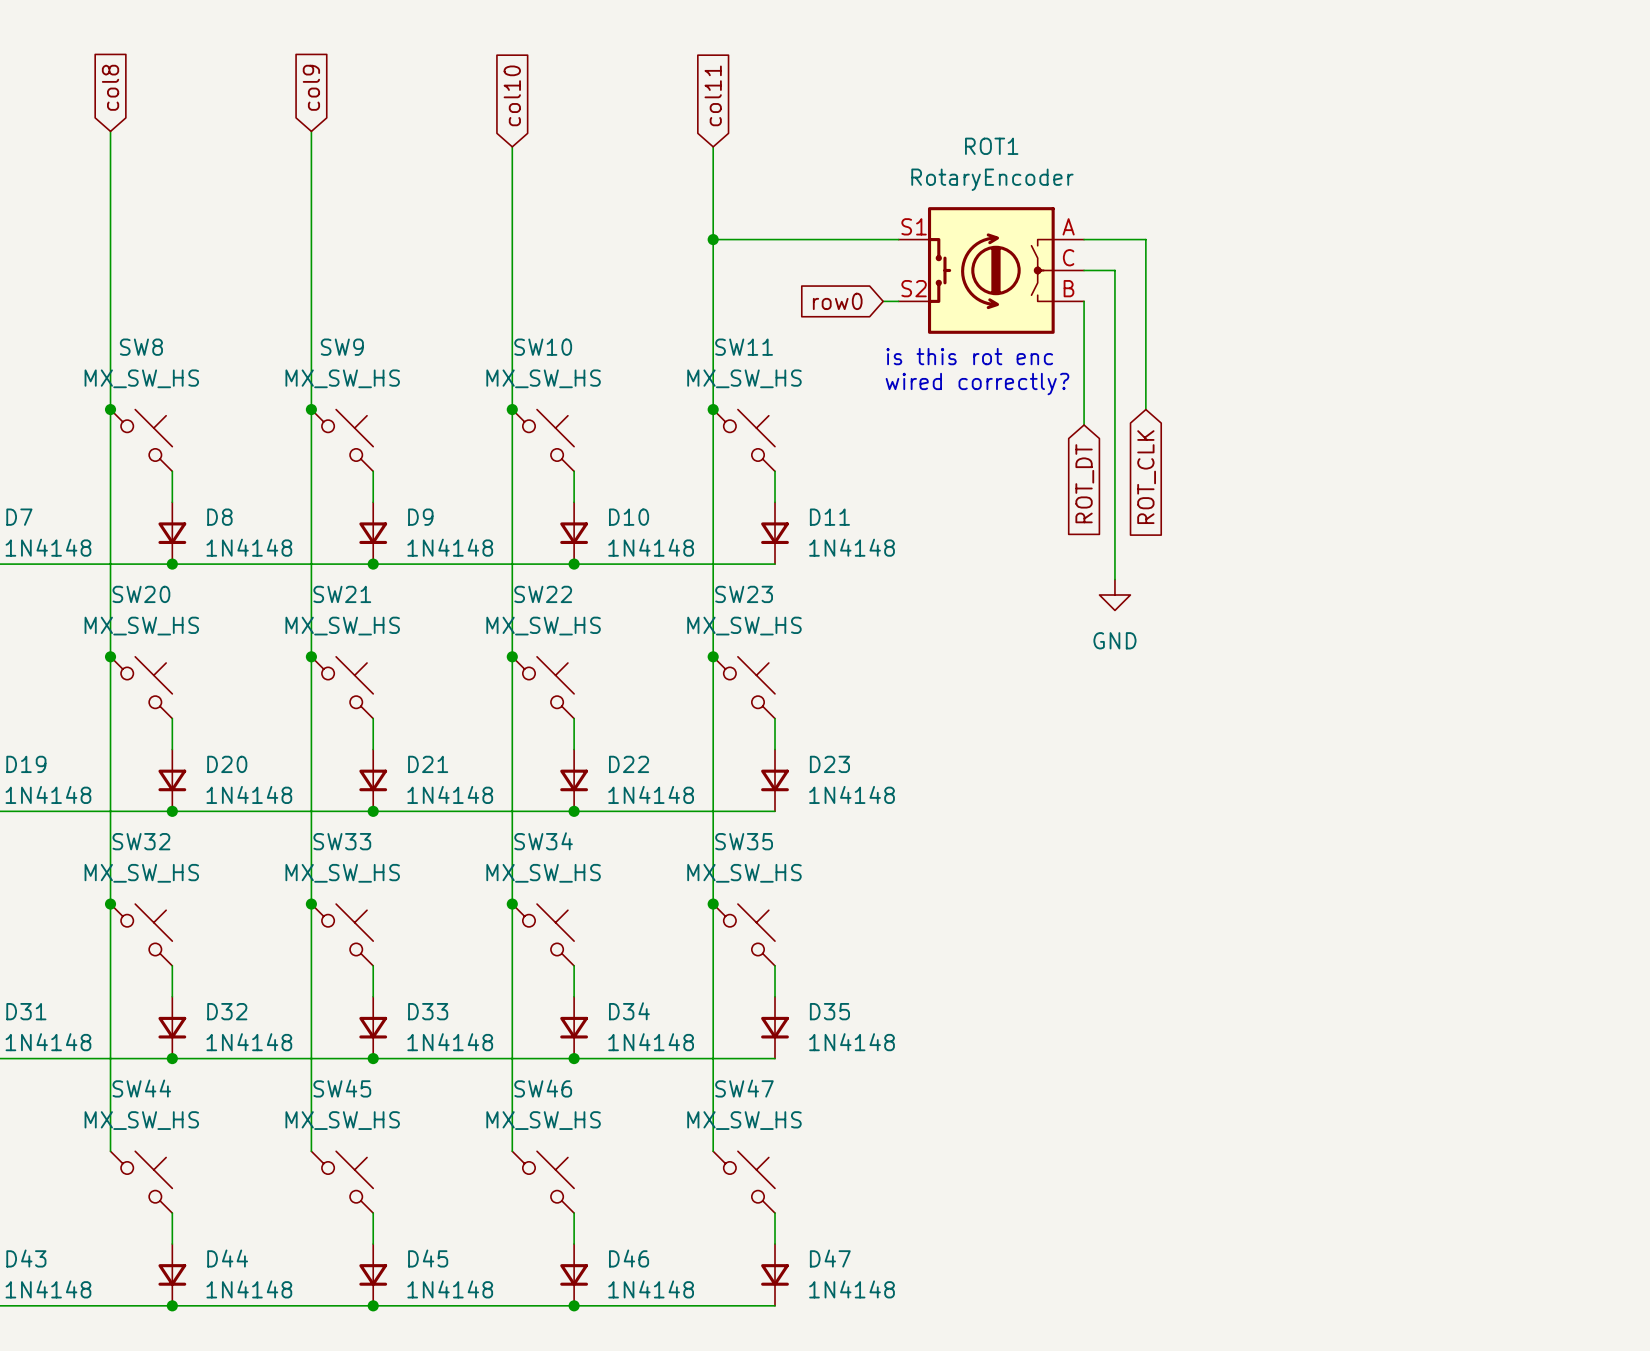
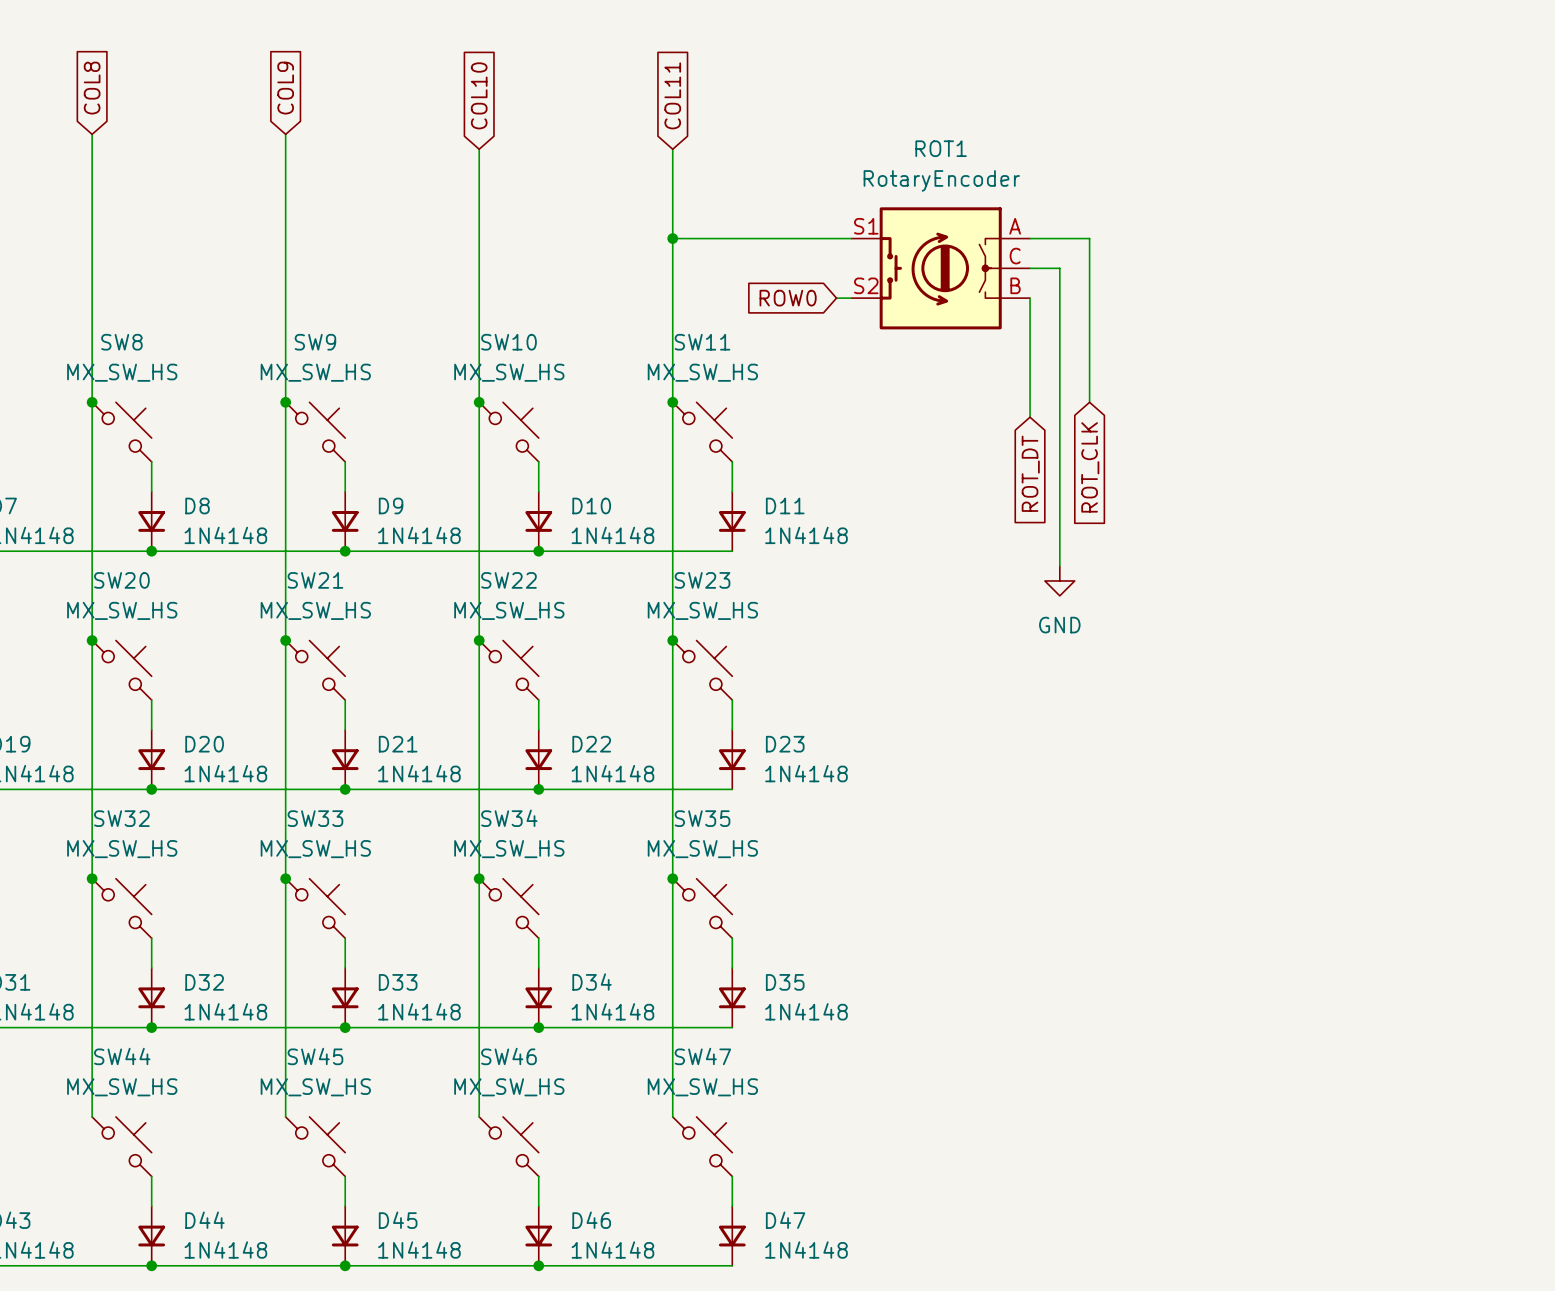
global label: col8 (110, 87) -> COL8 (92, 88)
global label: col9 (311, 87) -> COL9 (285, 88)
global label: col10 (512, 95) -> COL10 (479, 95)
global label: col11 (713, 95) -> COL11 (672, 95)
global label: row0 (837, 301) -> ROW0 (788, 298)
text: is this rot enc (969, 356) -> none
text: wired correctly? (977, 384) -> none

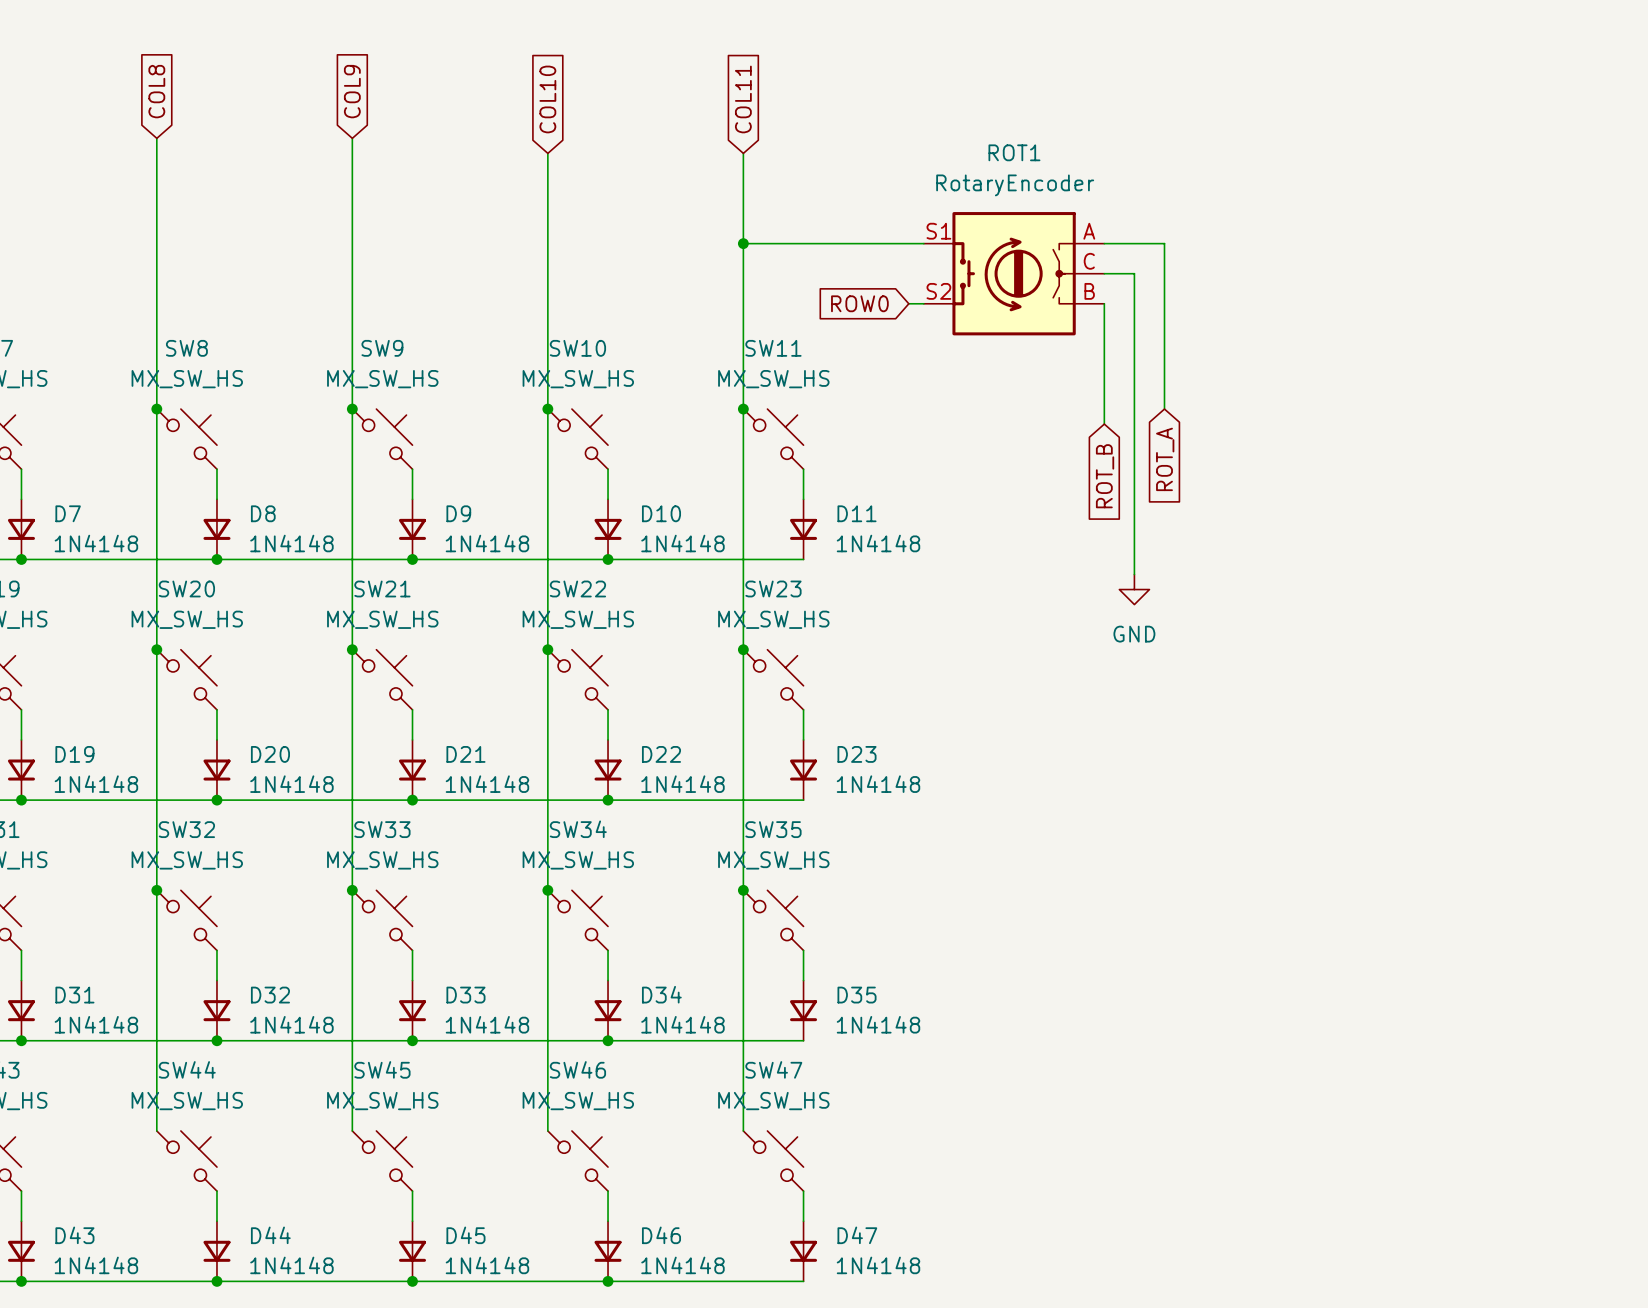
global label: ROT_CLK (1090, 467) -> ROT_A (1165, 459)
global label: ROT_DT (1030, 473) -> ROT_B (1105, 476)

